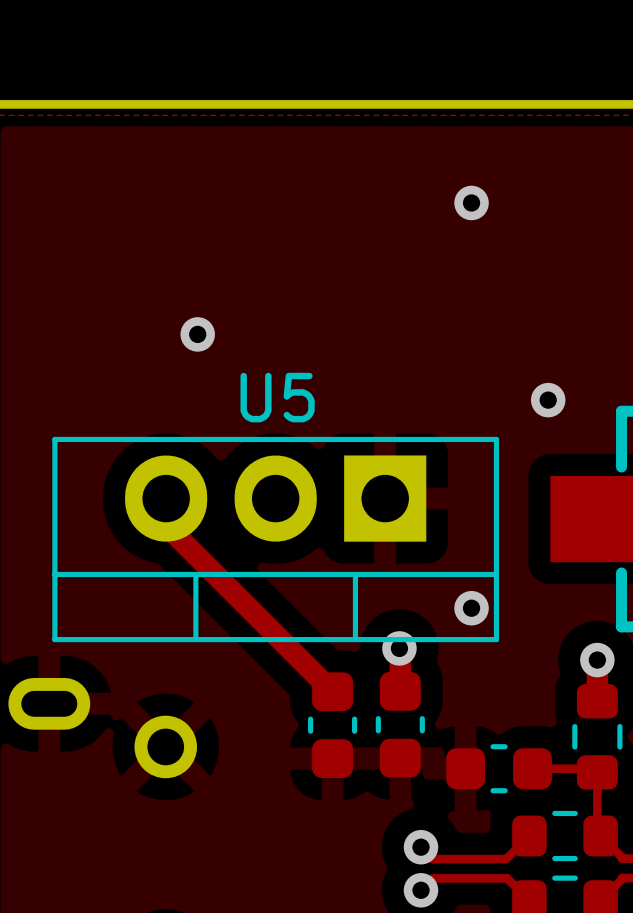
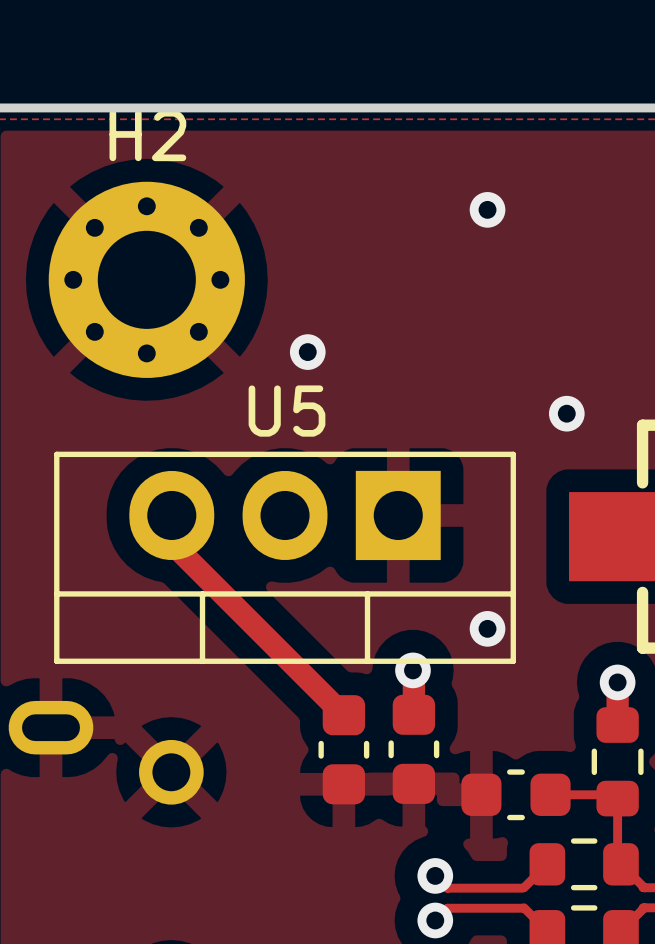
H2: none -> (146, 279)
via position: (197, 334) -> (307, 352)

